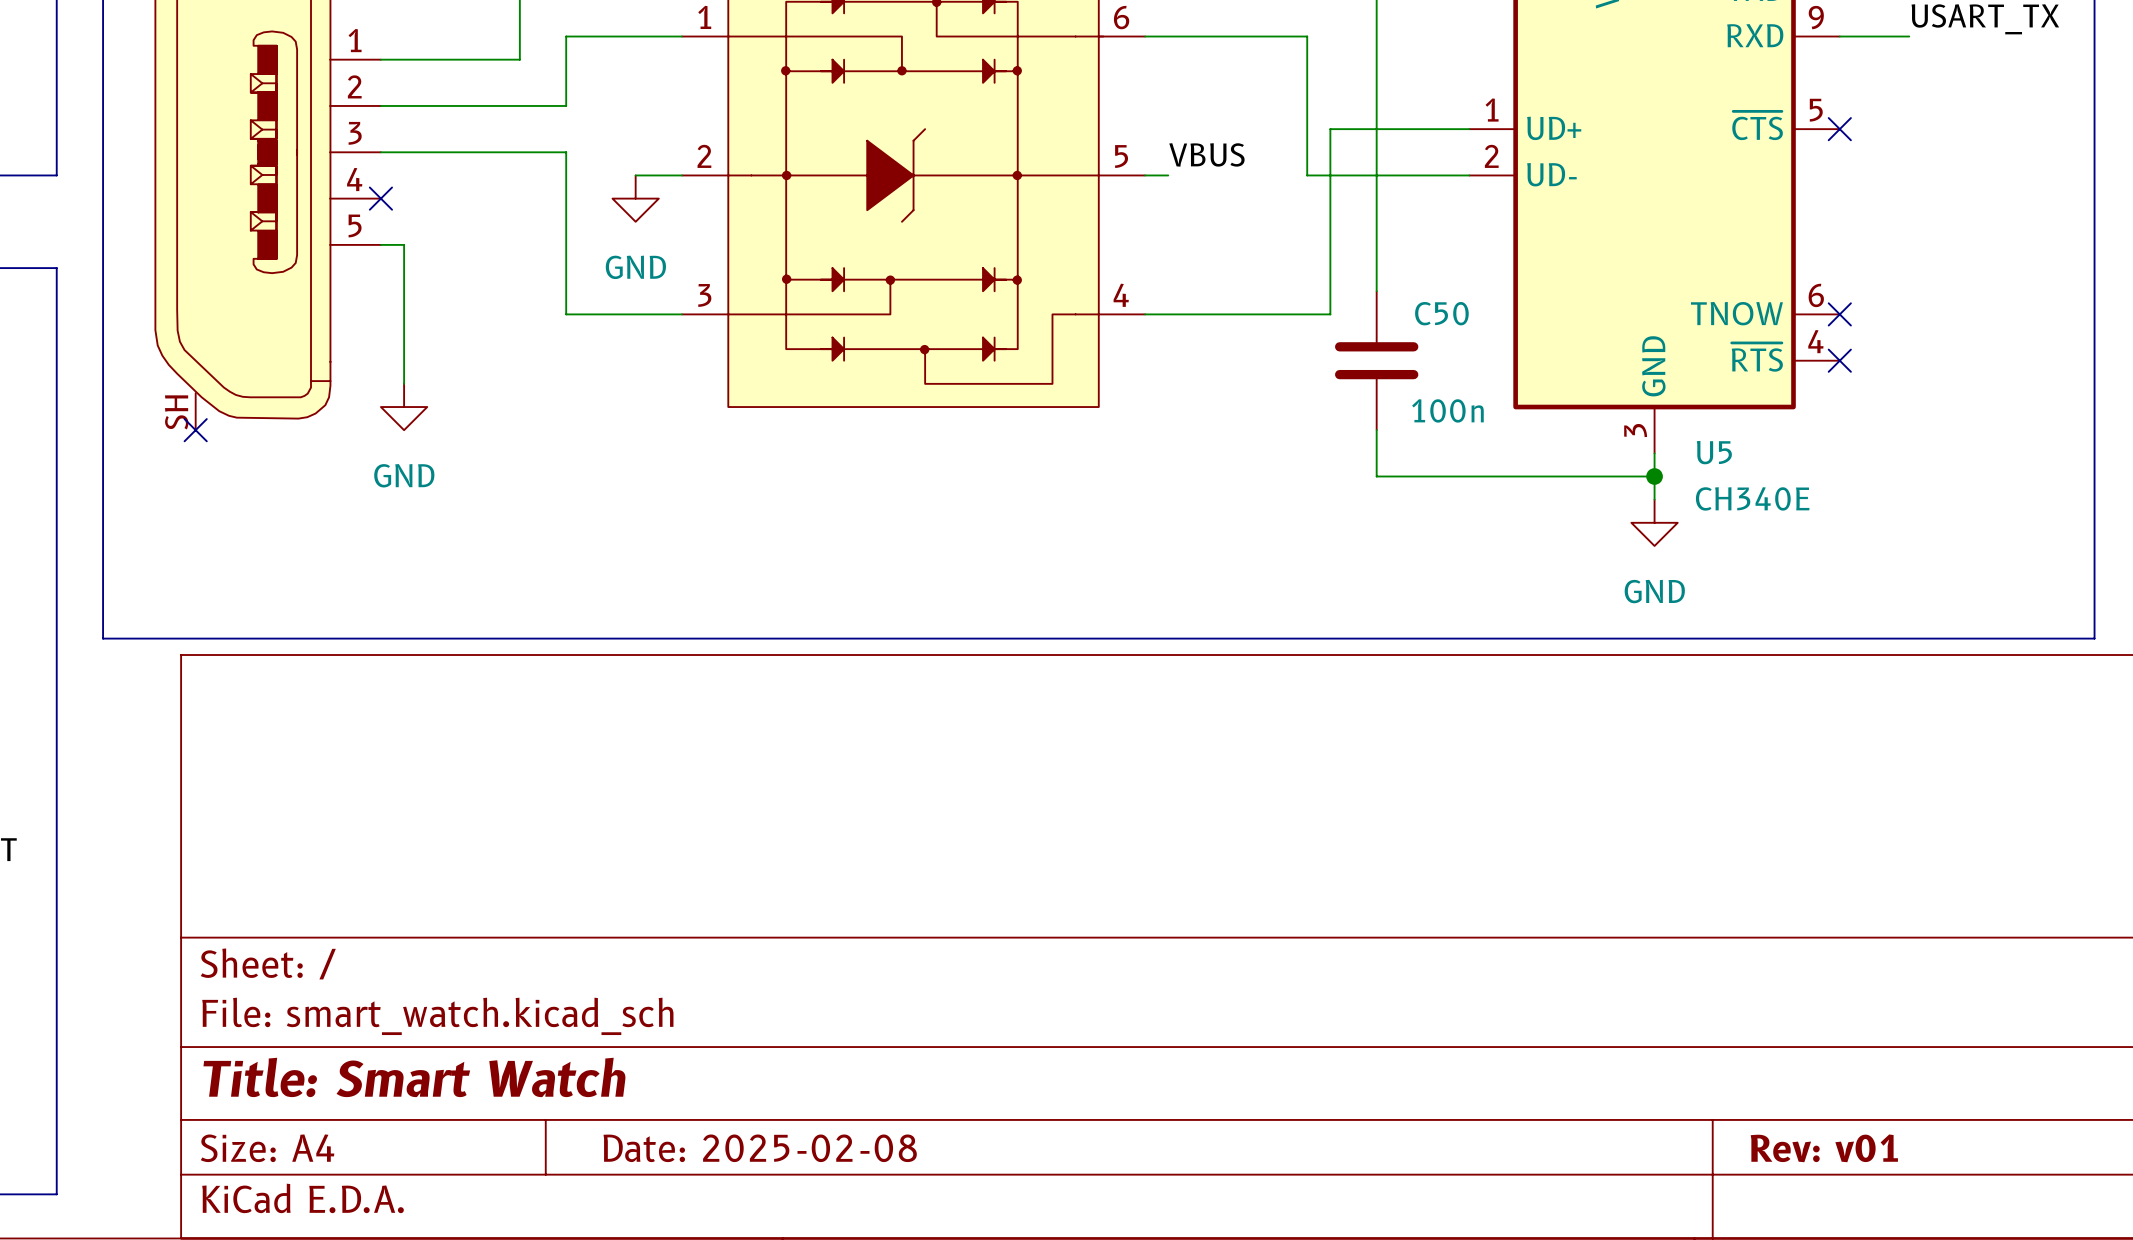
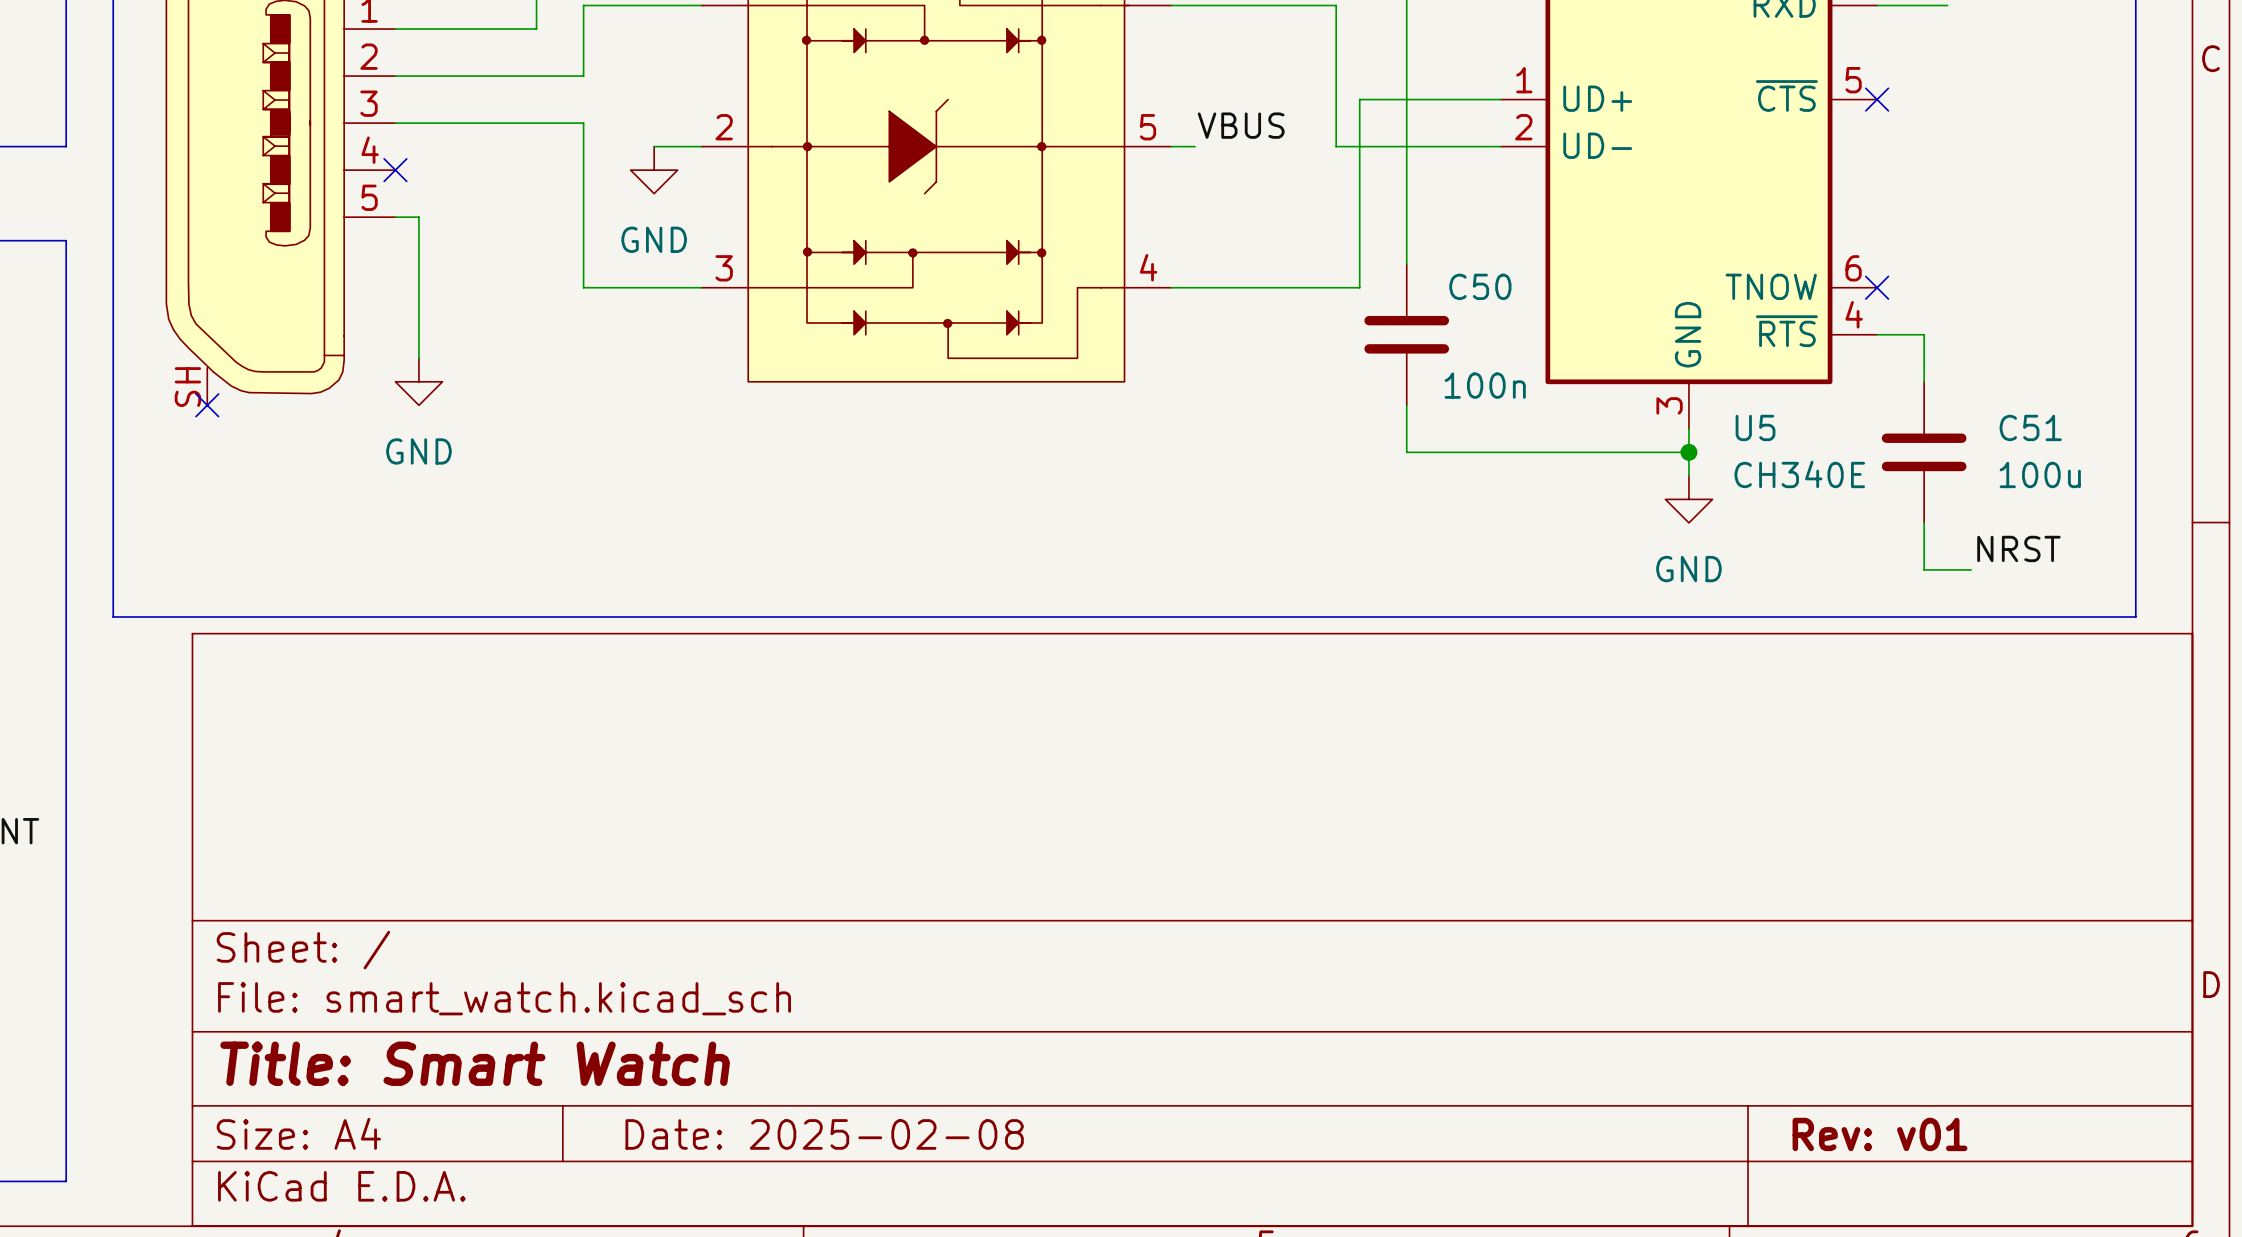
wire: none -> (1877, 334) (1924, 334) (1924, 381)
no-connect mark: (1839, 360) -> none
C51: none -> 100u (1924, 452)
wire: none -> (1924, 522) (1924, 569) (1971, 569)
label: none -> NRST (2018, 548)

